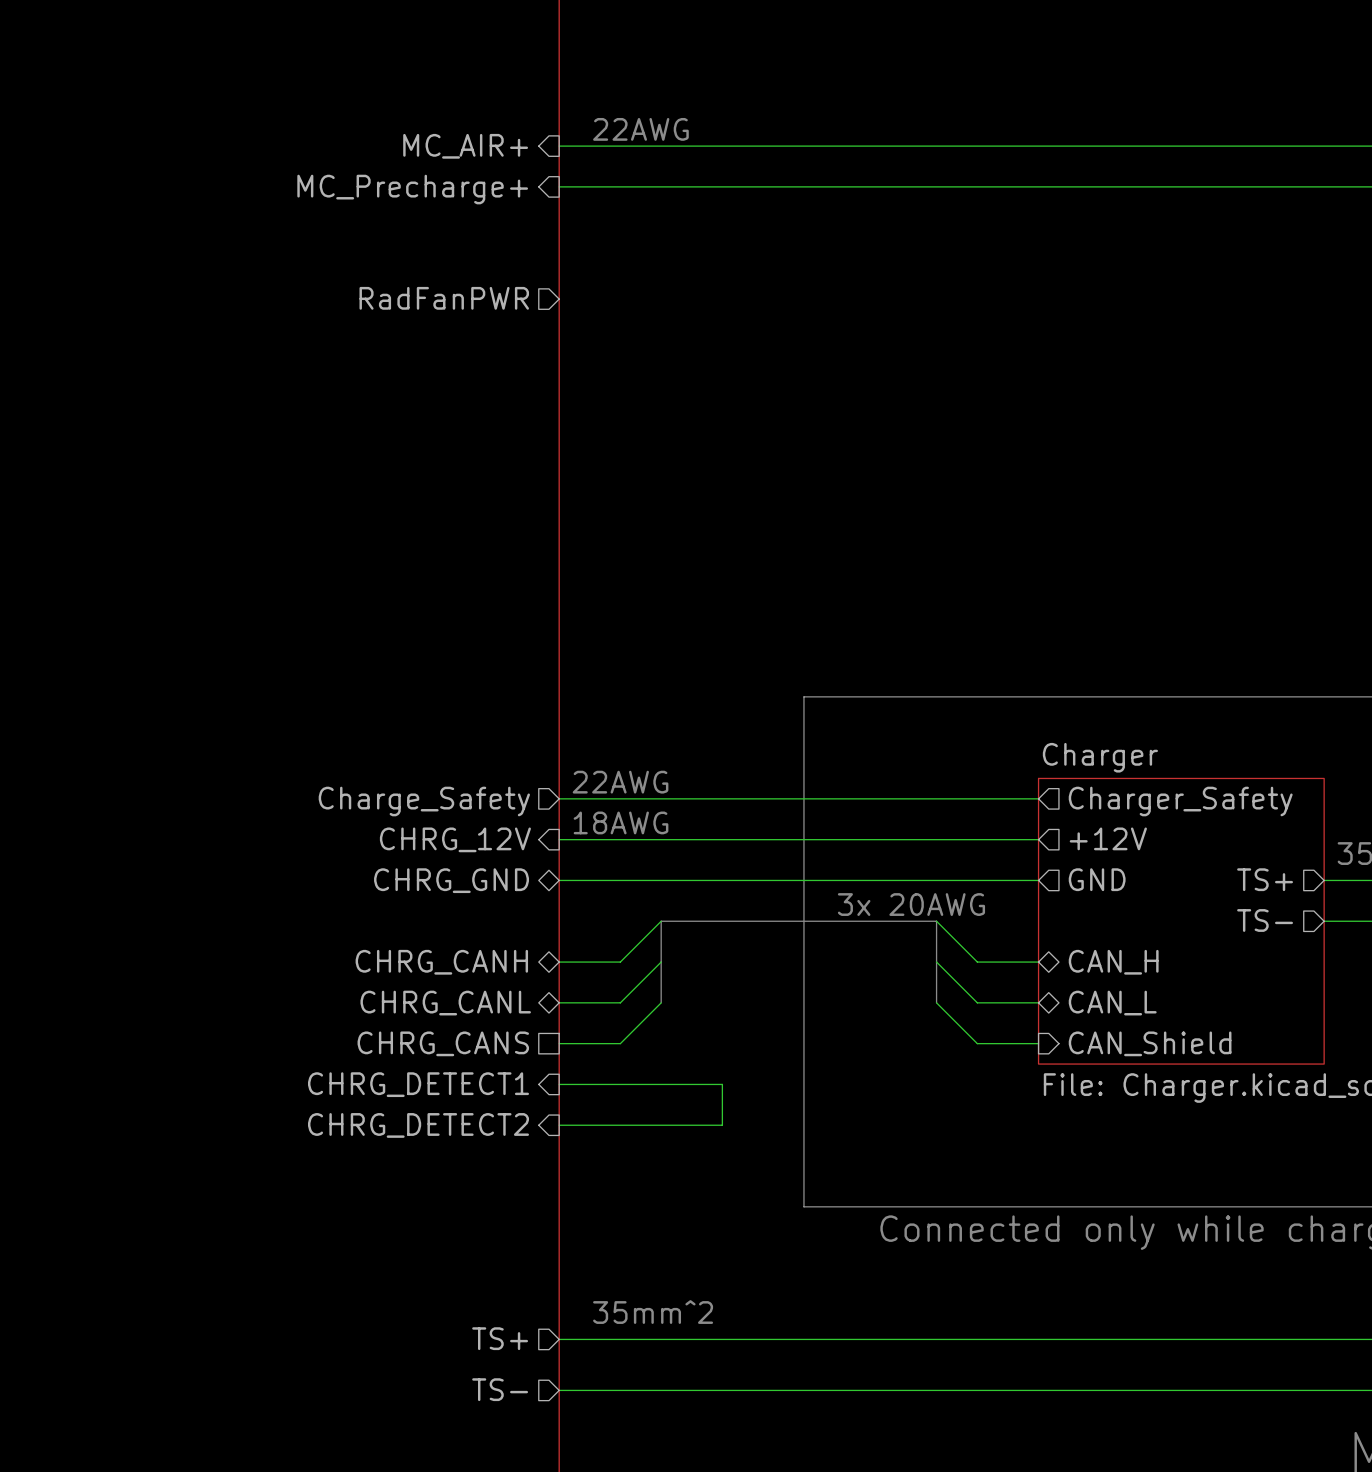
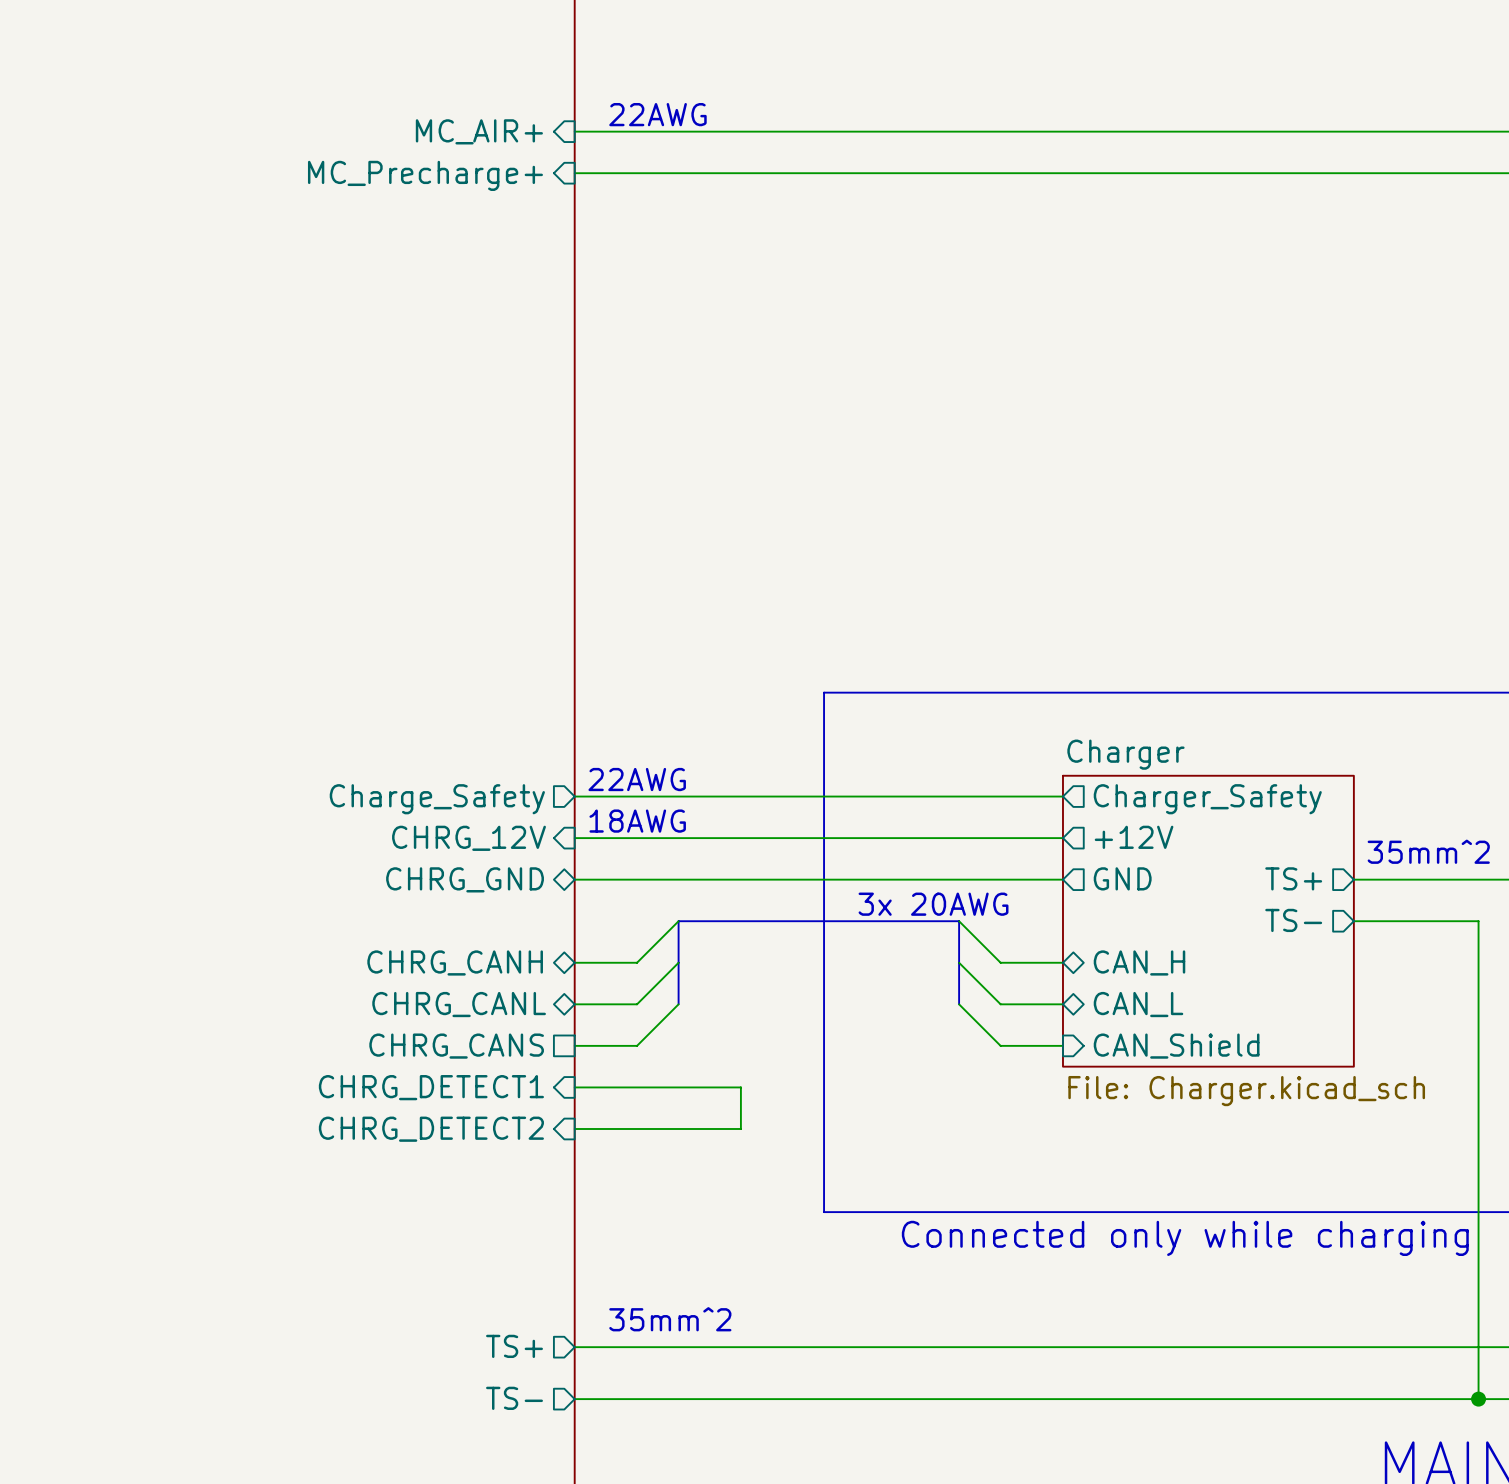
sheet pin: RadFanPWR (444, 298) -> none

